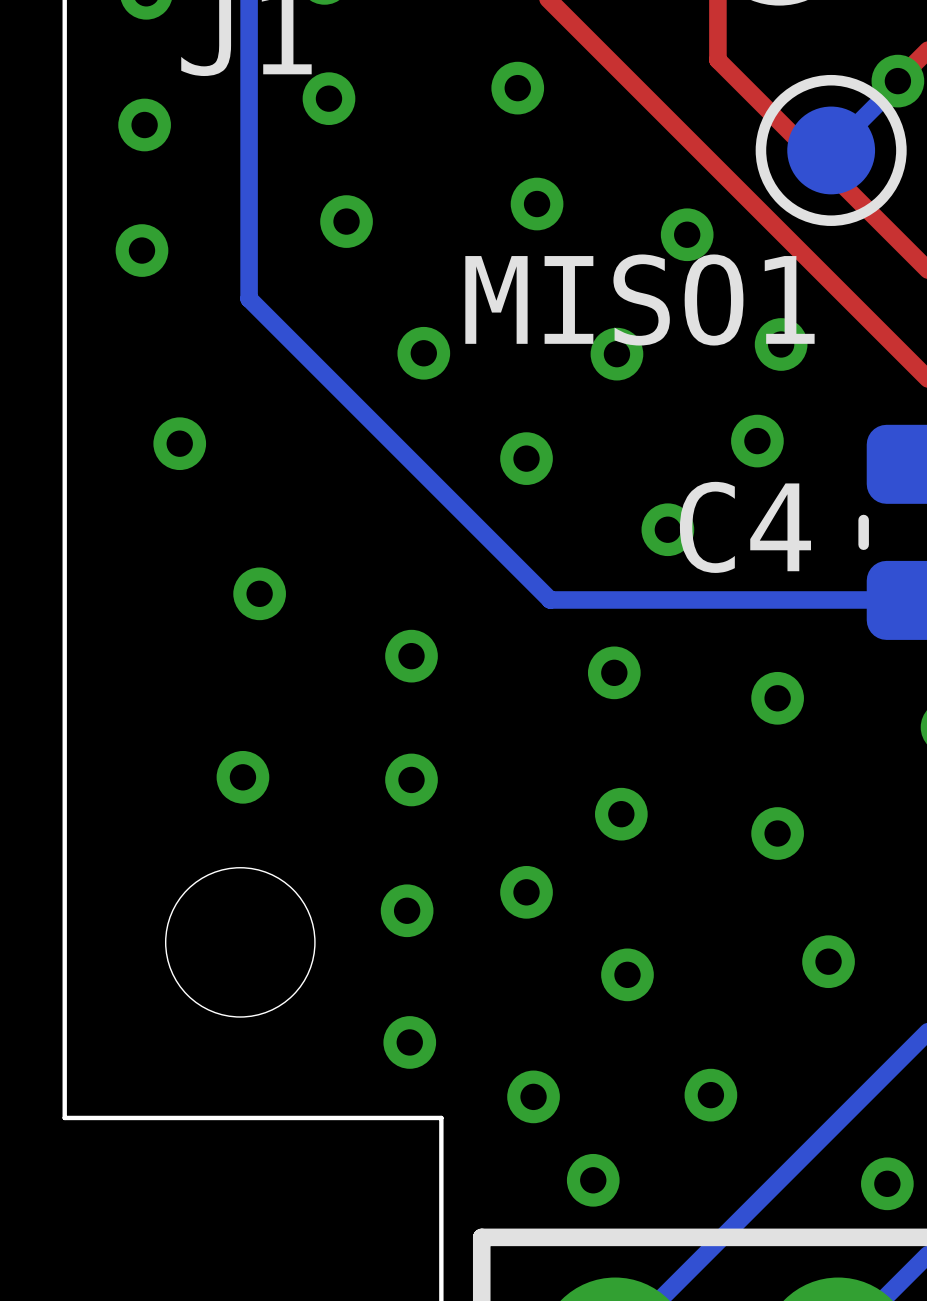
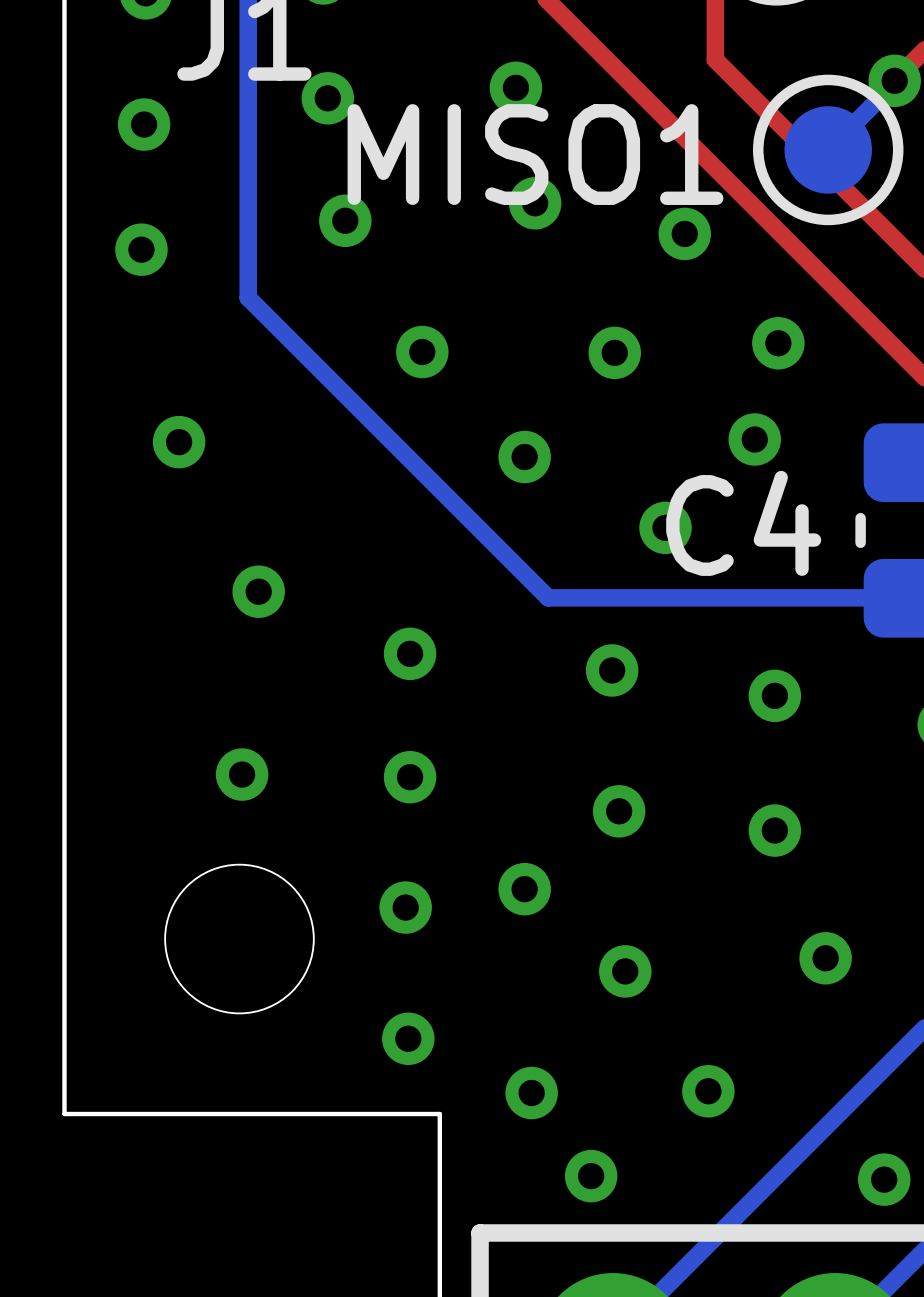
MISO1 name position: MISO1 (639, 300) -> MISO1 (535, 154)

